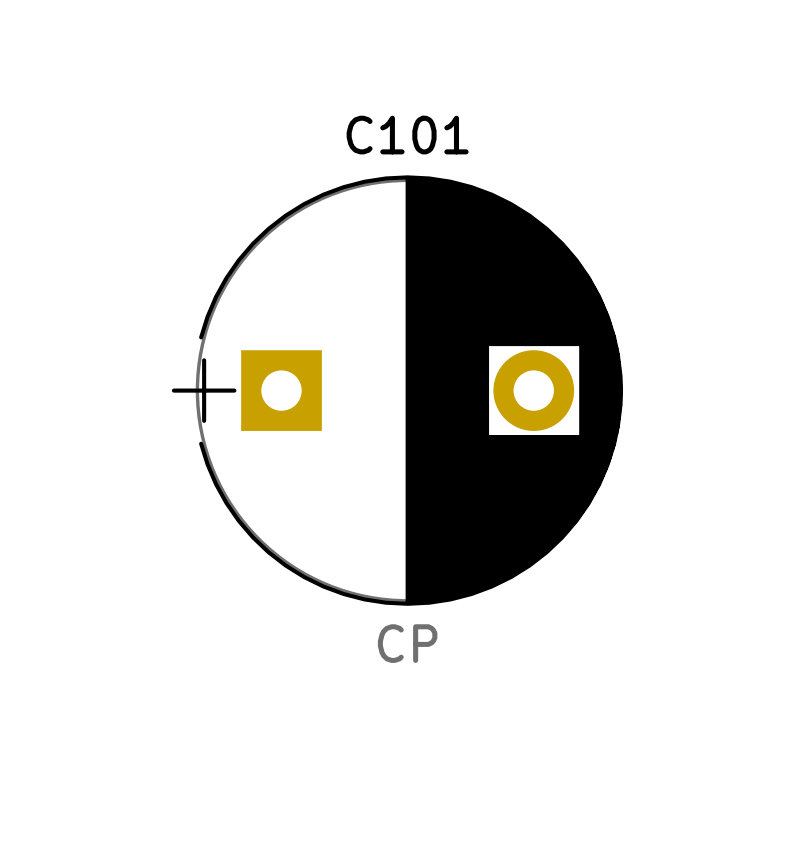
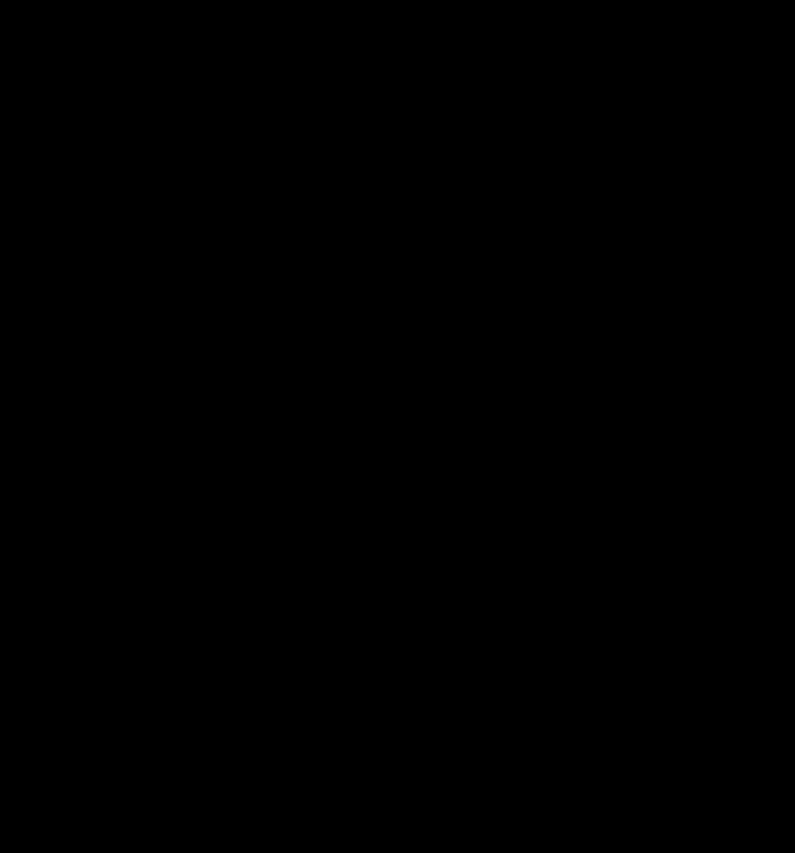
C101: CP (397, 390) -> none

